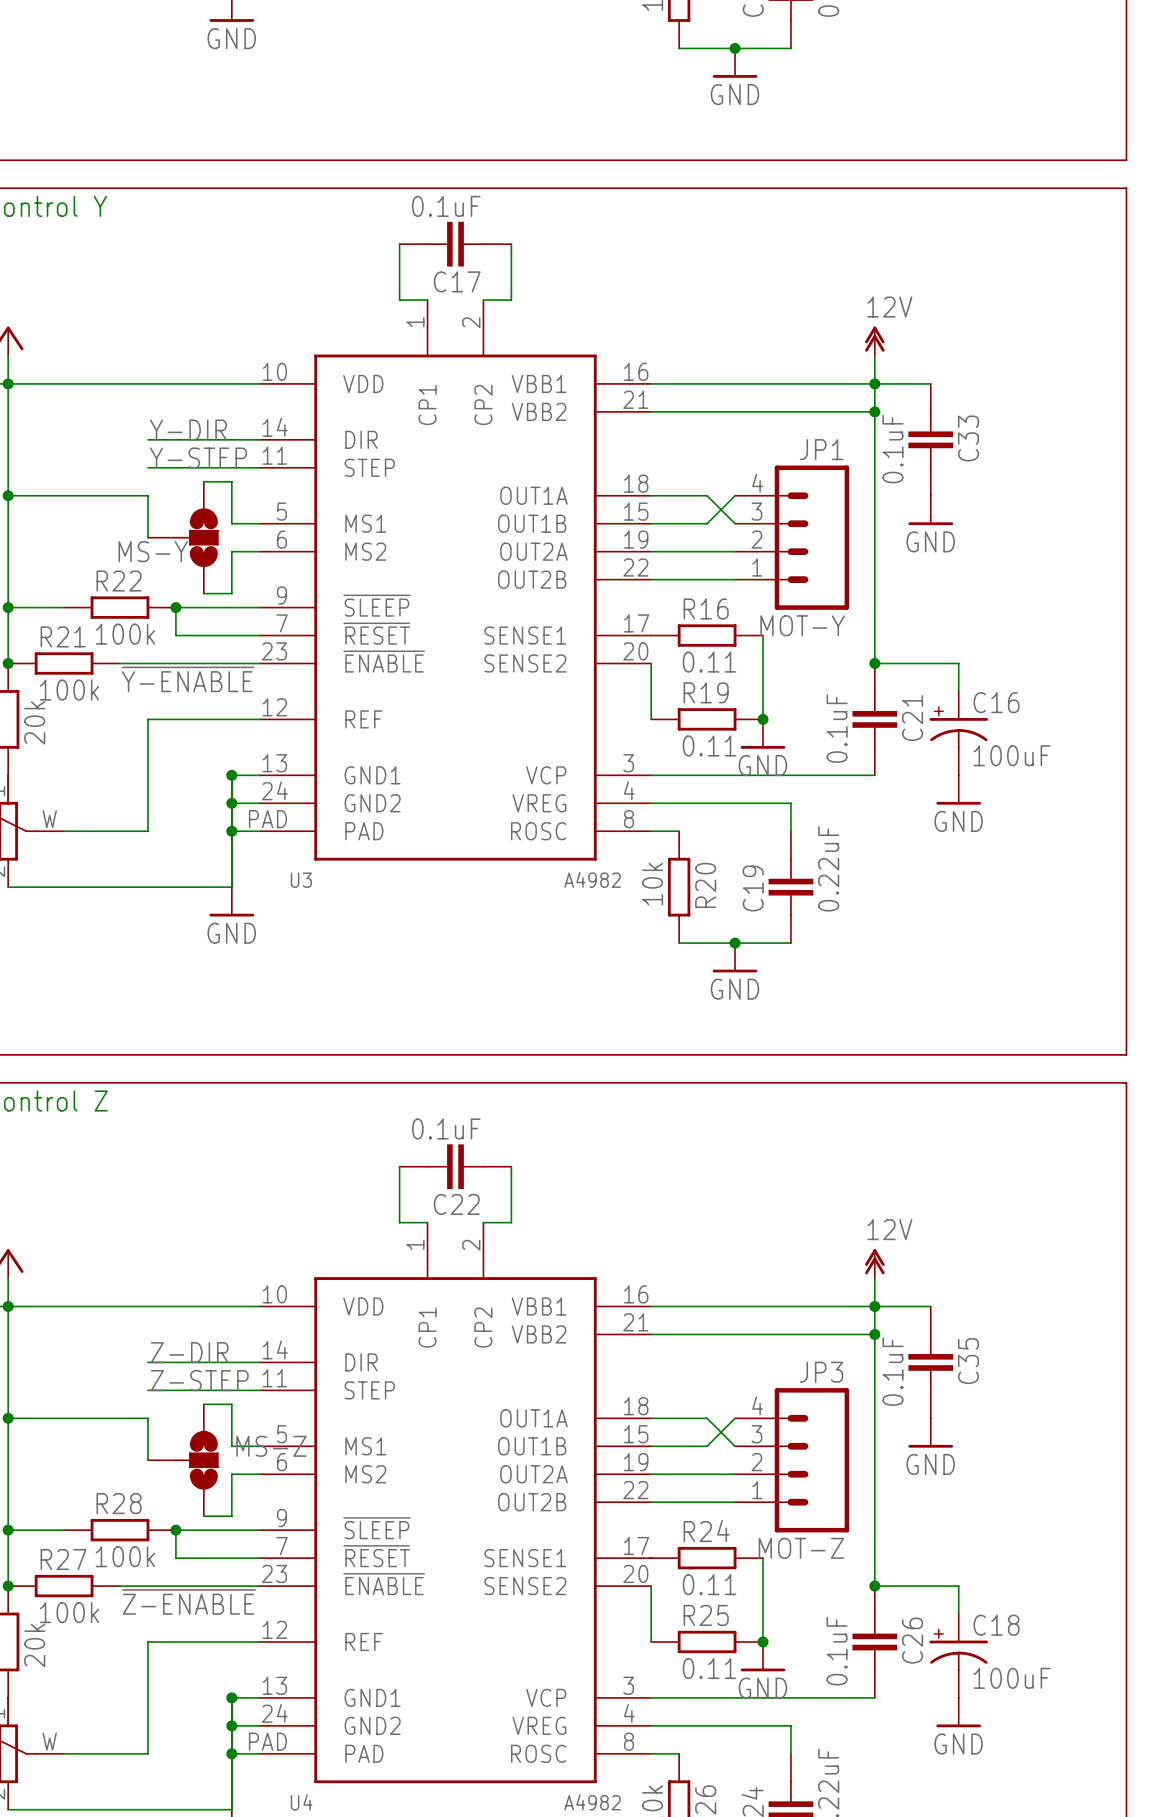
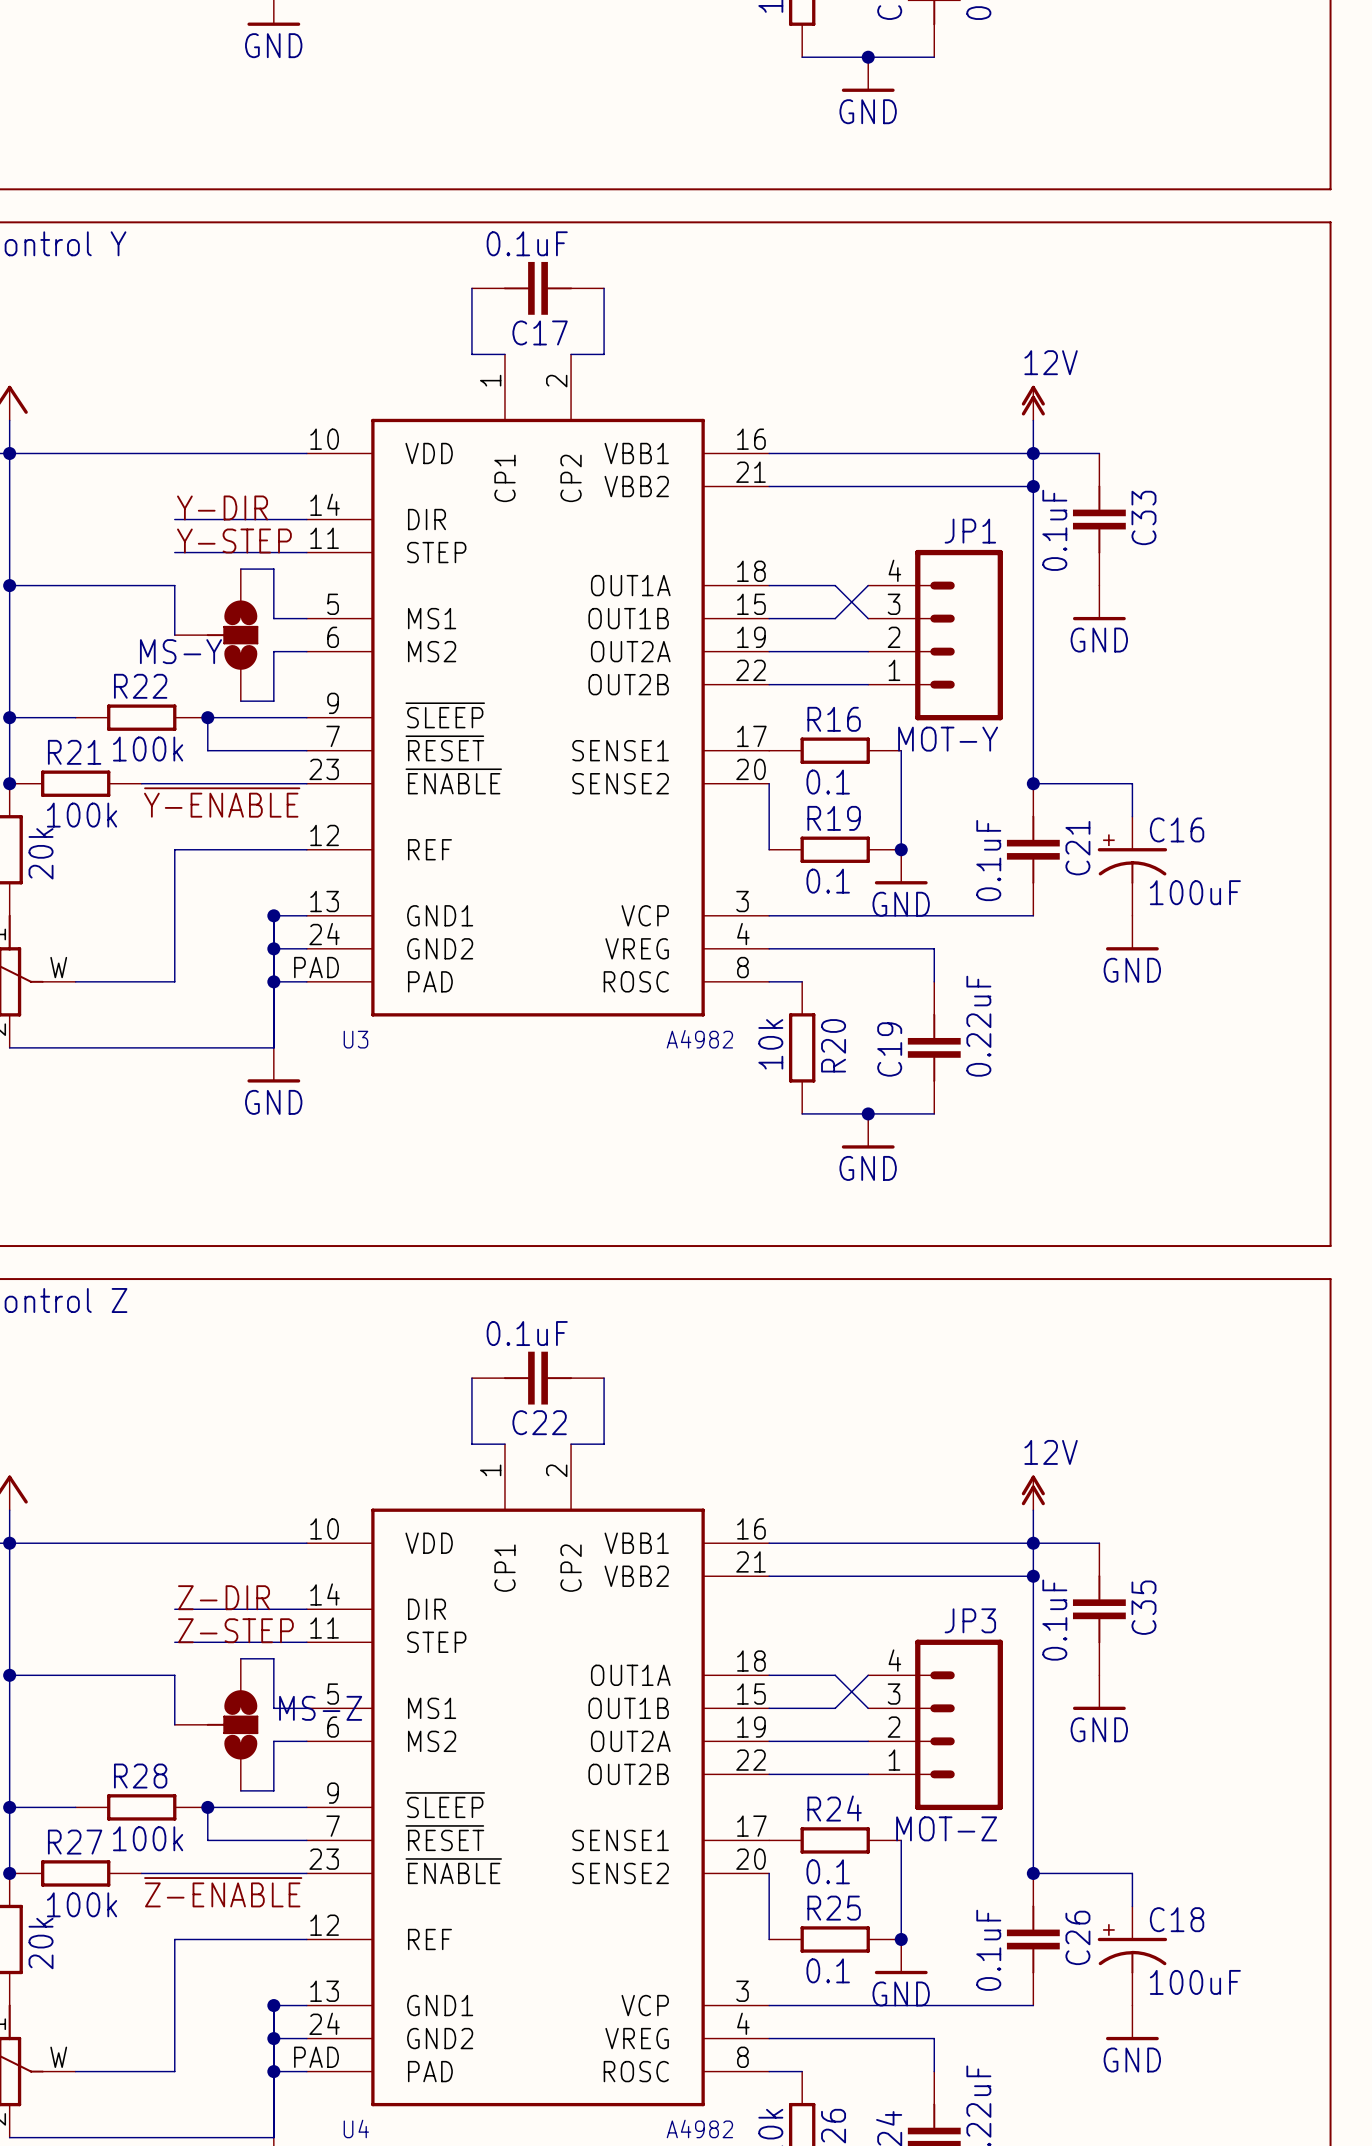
R16 value: 0.11 (709, 662) -> 0.1 (828, 782)
R19 value: 0.11 (709, 745) -> 0.1 (828, 881)
R24 value: 0.11 (709, 1584) -> 0.1 (828, 1871)
R25 value: 0.11 (709, 1668) -> 0.1 (828, 1970)

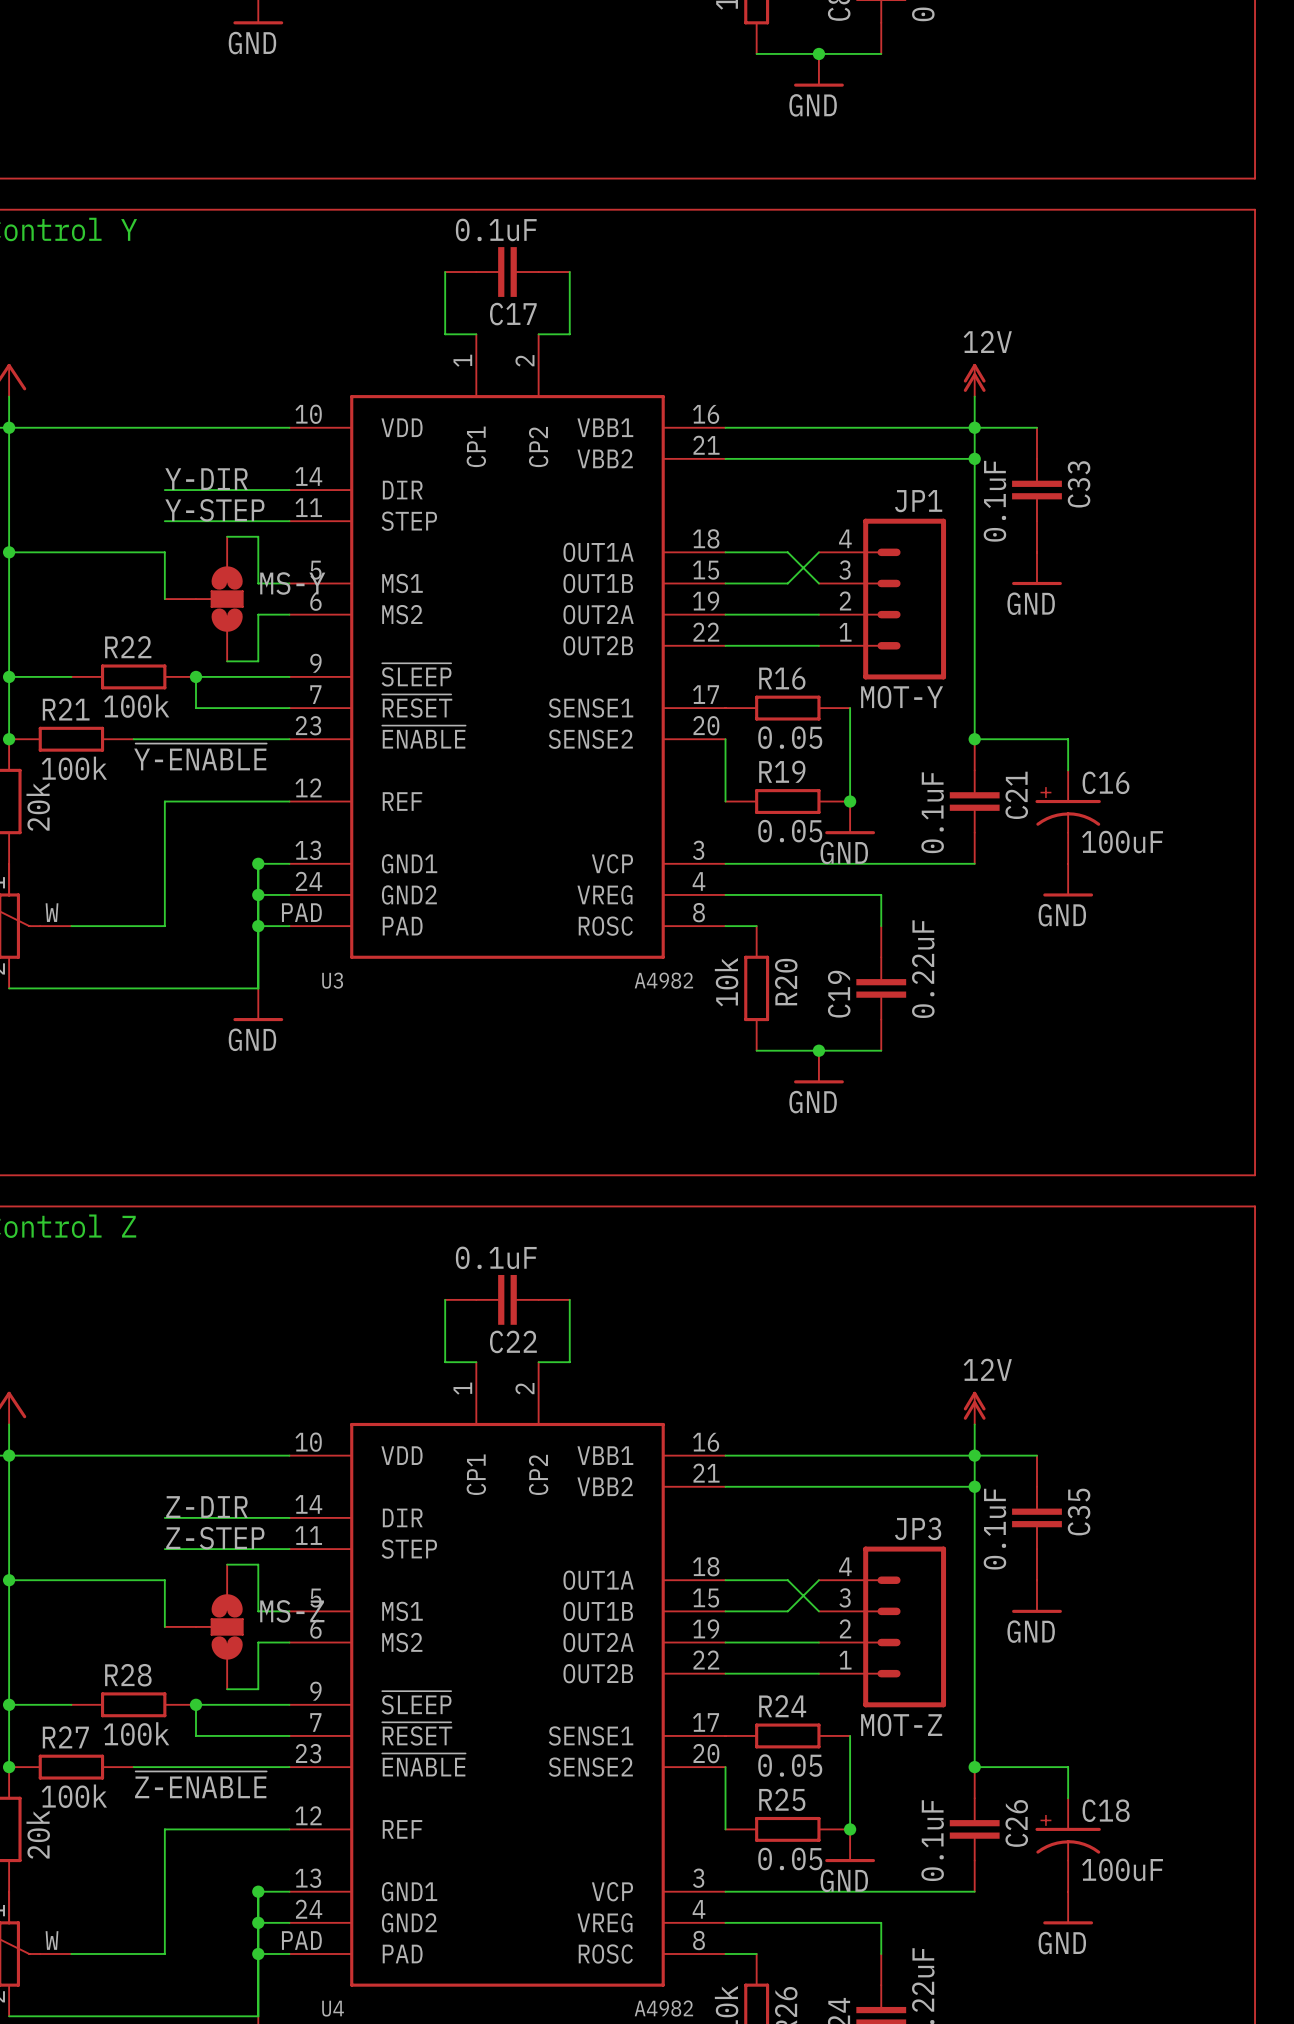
MS-Y name position: MS-Y (180, 651) -> MS-Y (292, 583)
R16 value: 0.1 (828, 782) -> 0.05 (790, 737)
R19 value: 0.1 (828, 881) -> 0.05 (790, 831)
R24 value: 0.1 (828, 1871) -> 0.05 (790, 1765)
R25 value: 0.1 (828, 1970) -> 0.05 (790, 1859)

